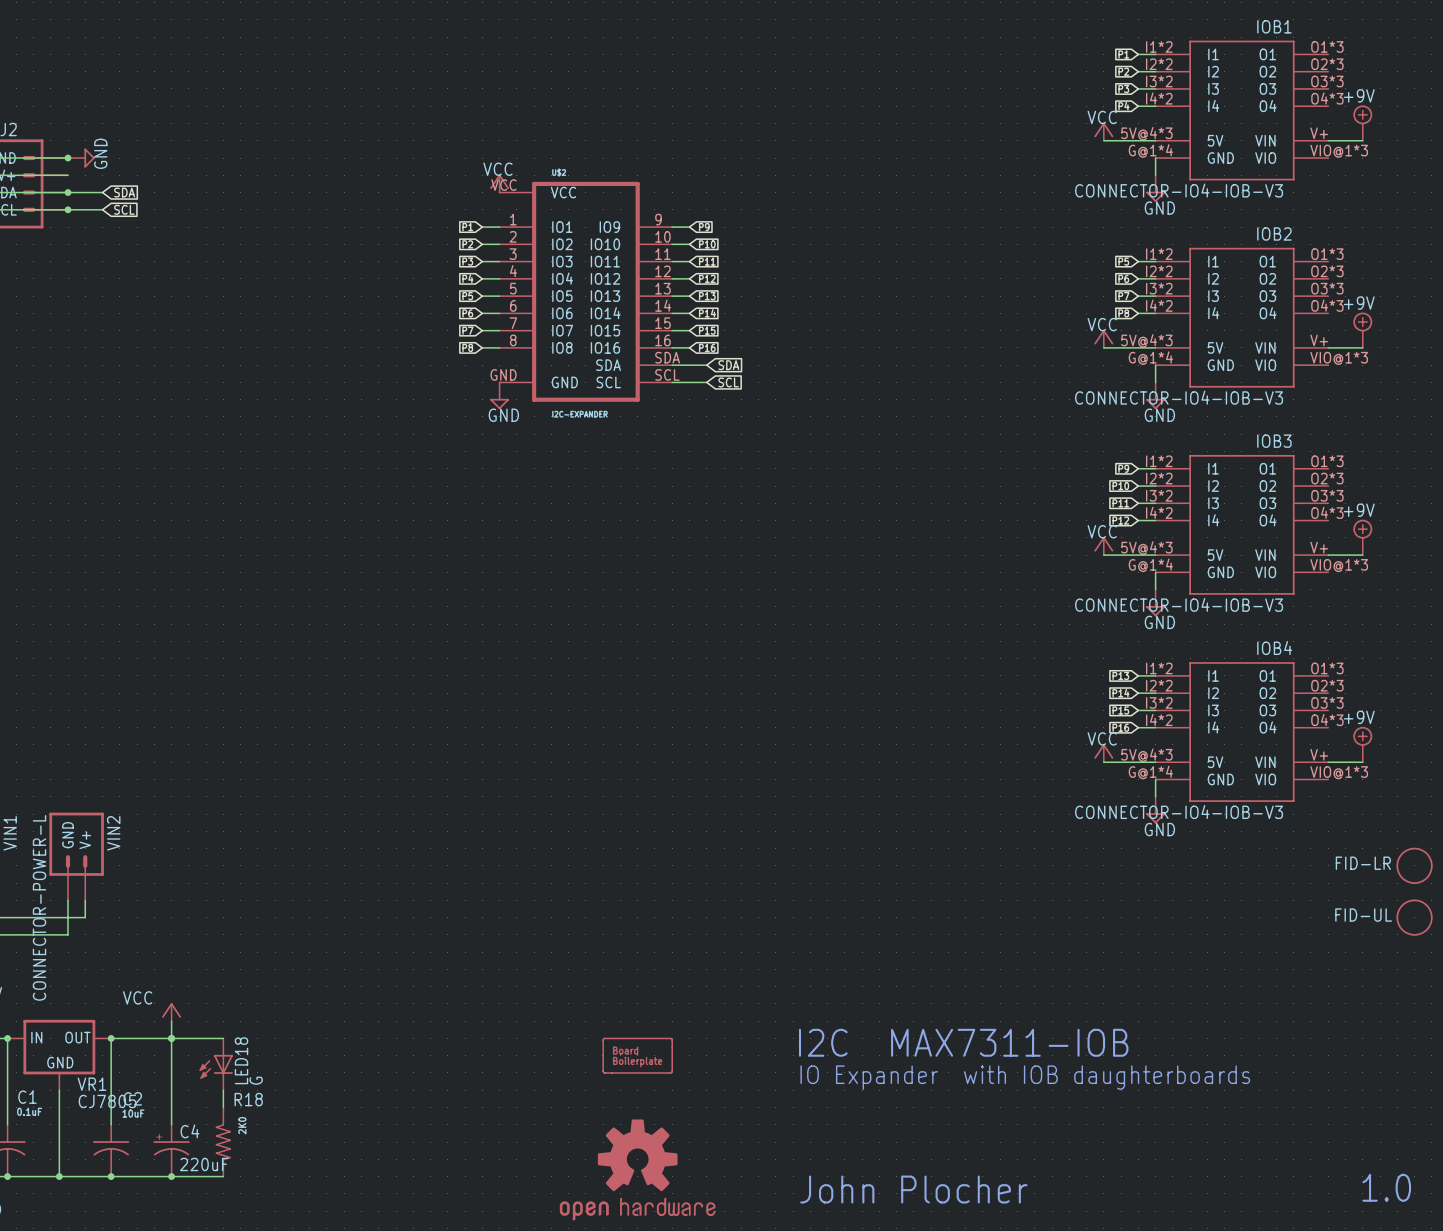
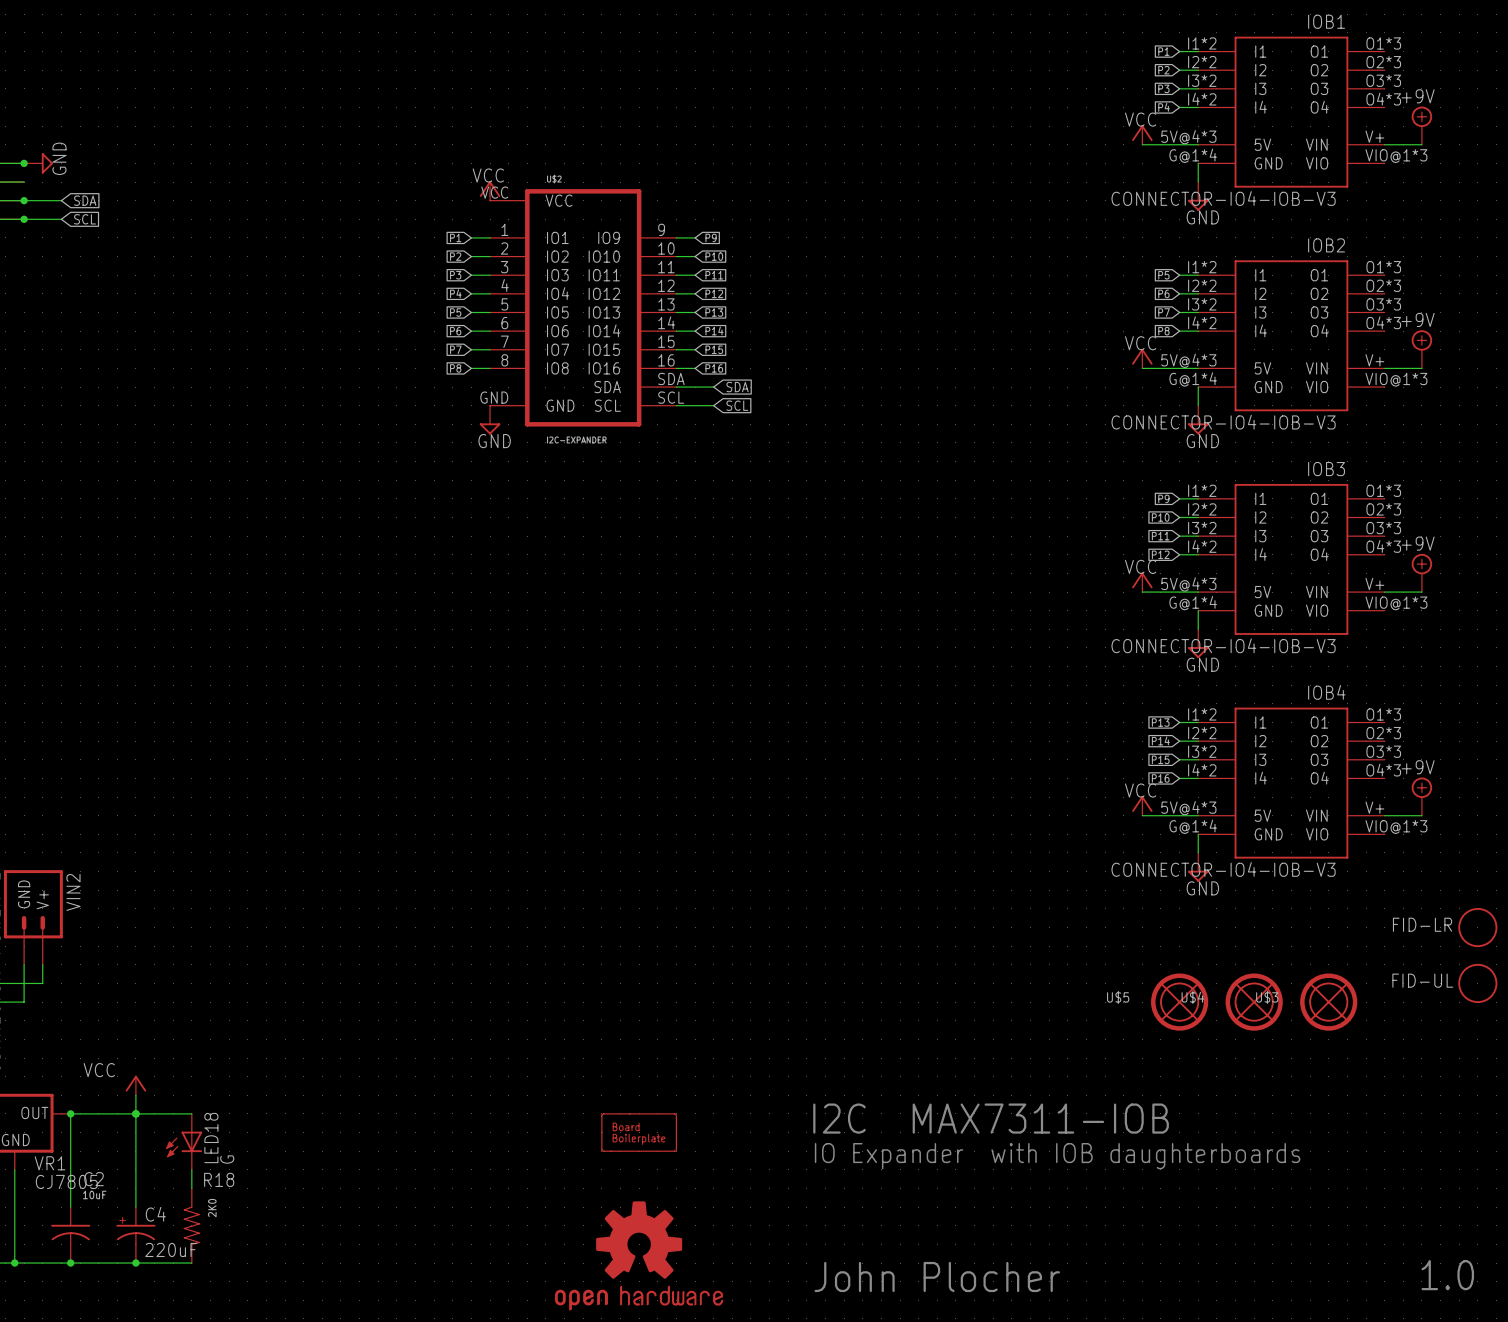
U$5: none -> (1179, 1002)
U$4: none -> (1254, 1002)
U$3: none -> (1328, 1002)

